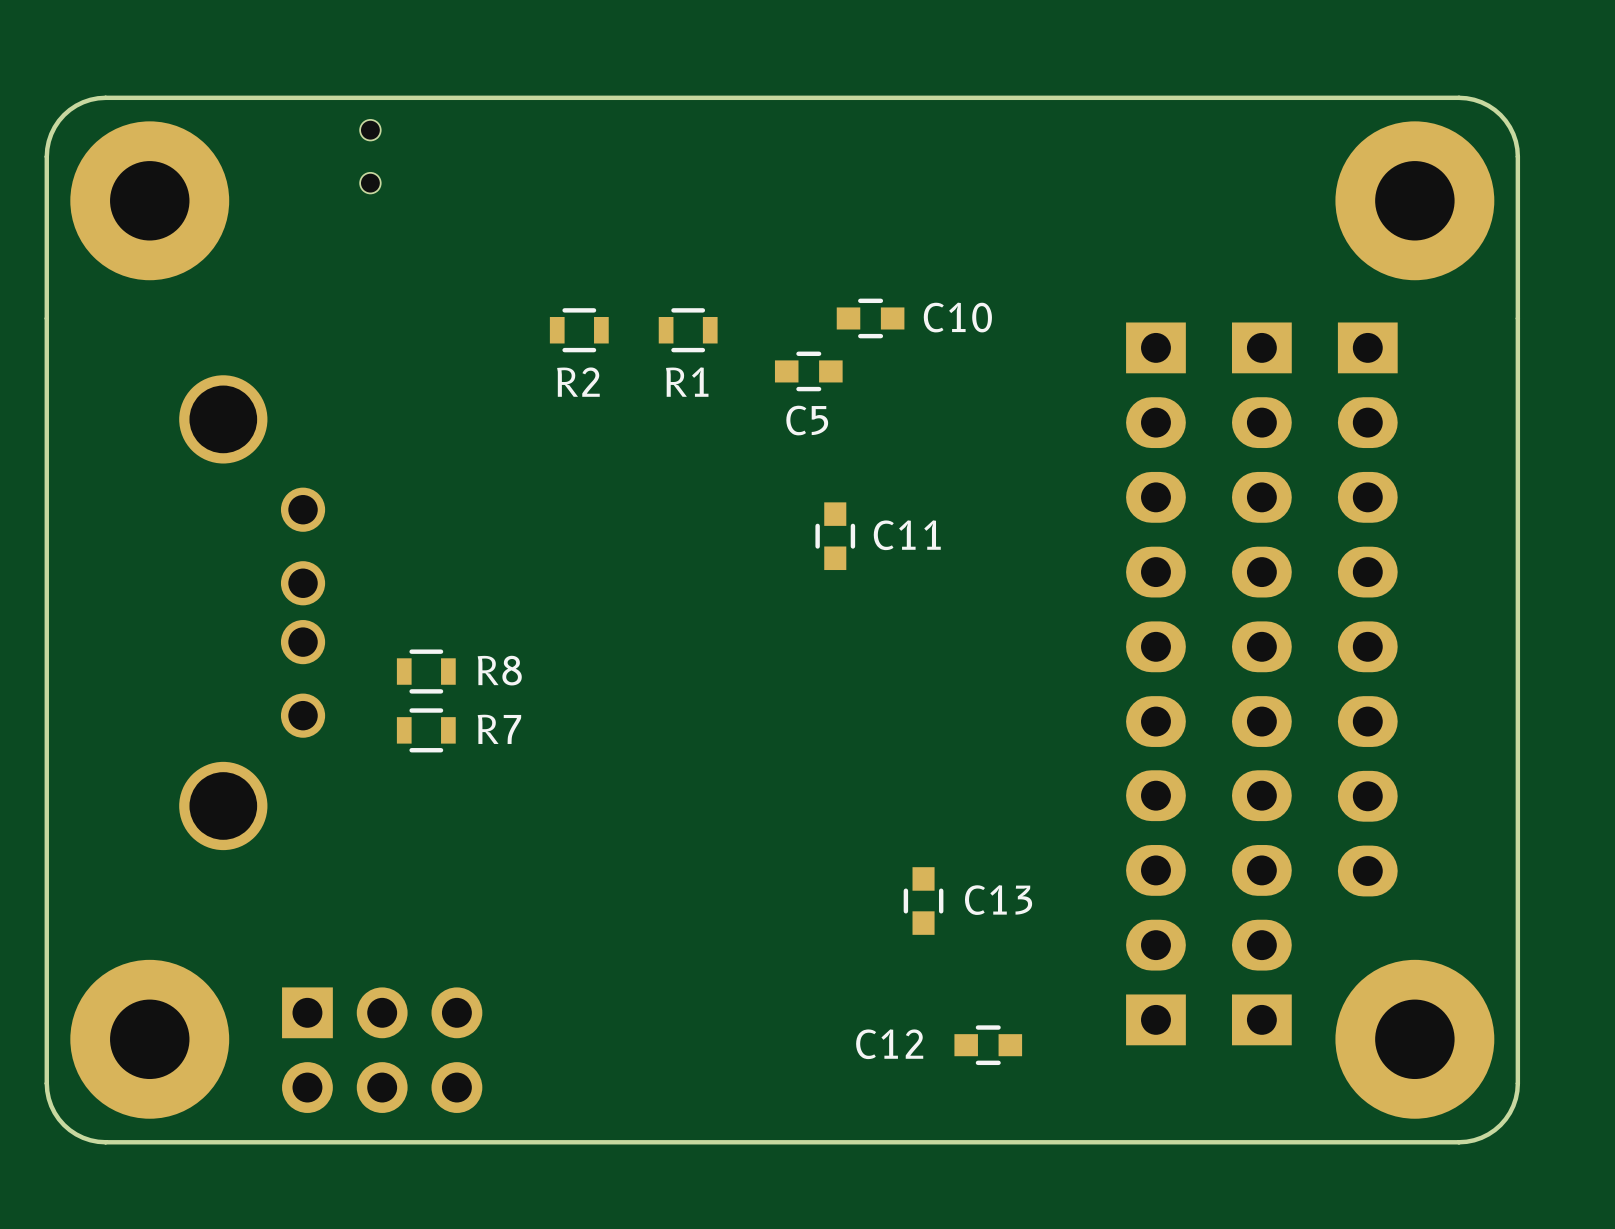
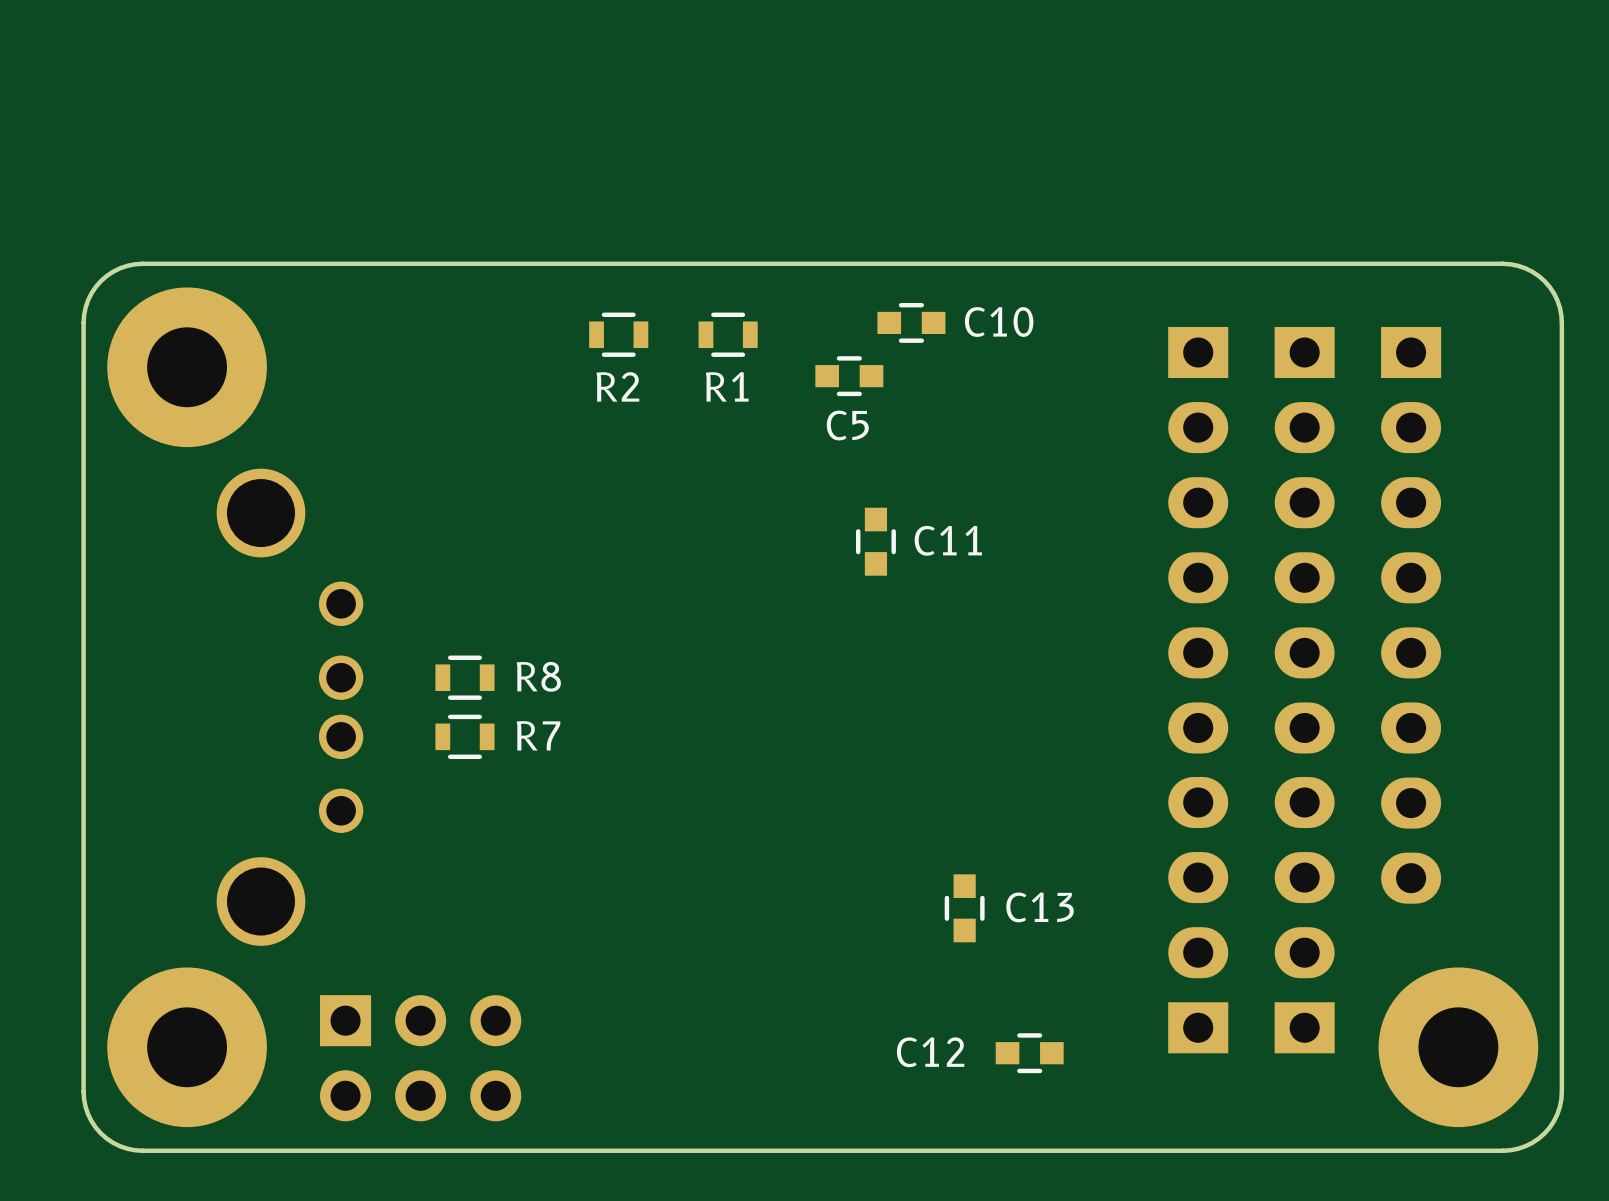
part: (370, 156) -> none
part position: (149, 200) -> (187, 367)
part: (1414, 200) -> none
board edge: (1517, 318) (1517, 156) (1515, 141) (1509, 127) (1494, 109) (1474, 99) (1459, 97) (97, 98) (83, 102) (69, 109) (54, 127) (48, 141) (46, 156) (46, 318) -> (1561, 322) (1557, 300) (1544, 281) (1525, 268) (1502, 263) (142, 263) (120, 268) (100, 281) (88, 300) (83, 322)
part position: (252, 612) -> (289, 707)

